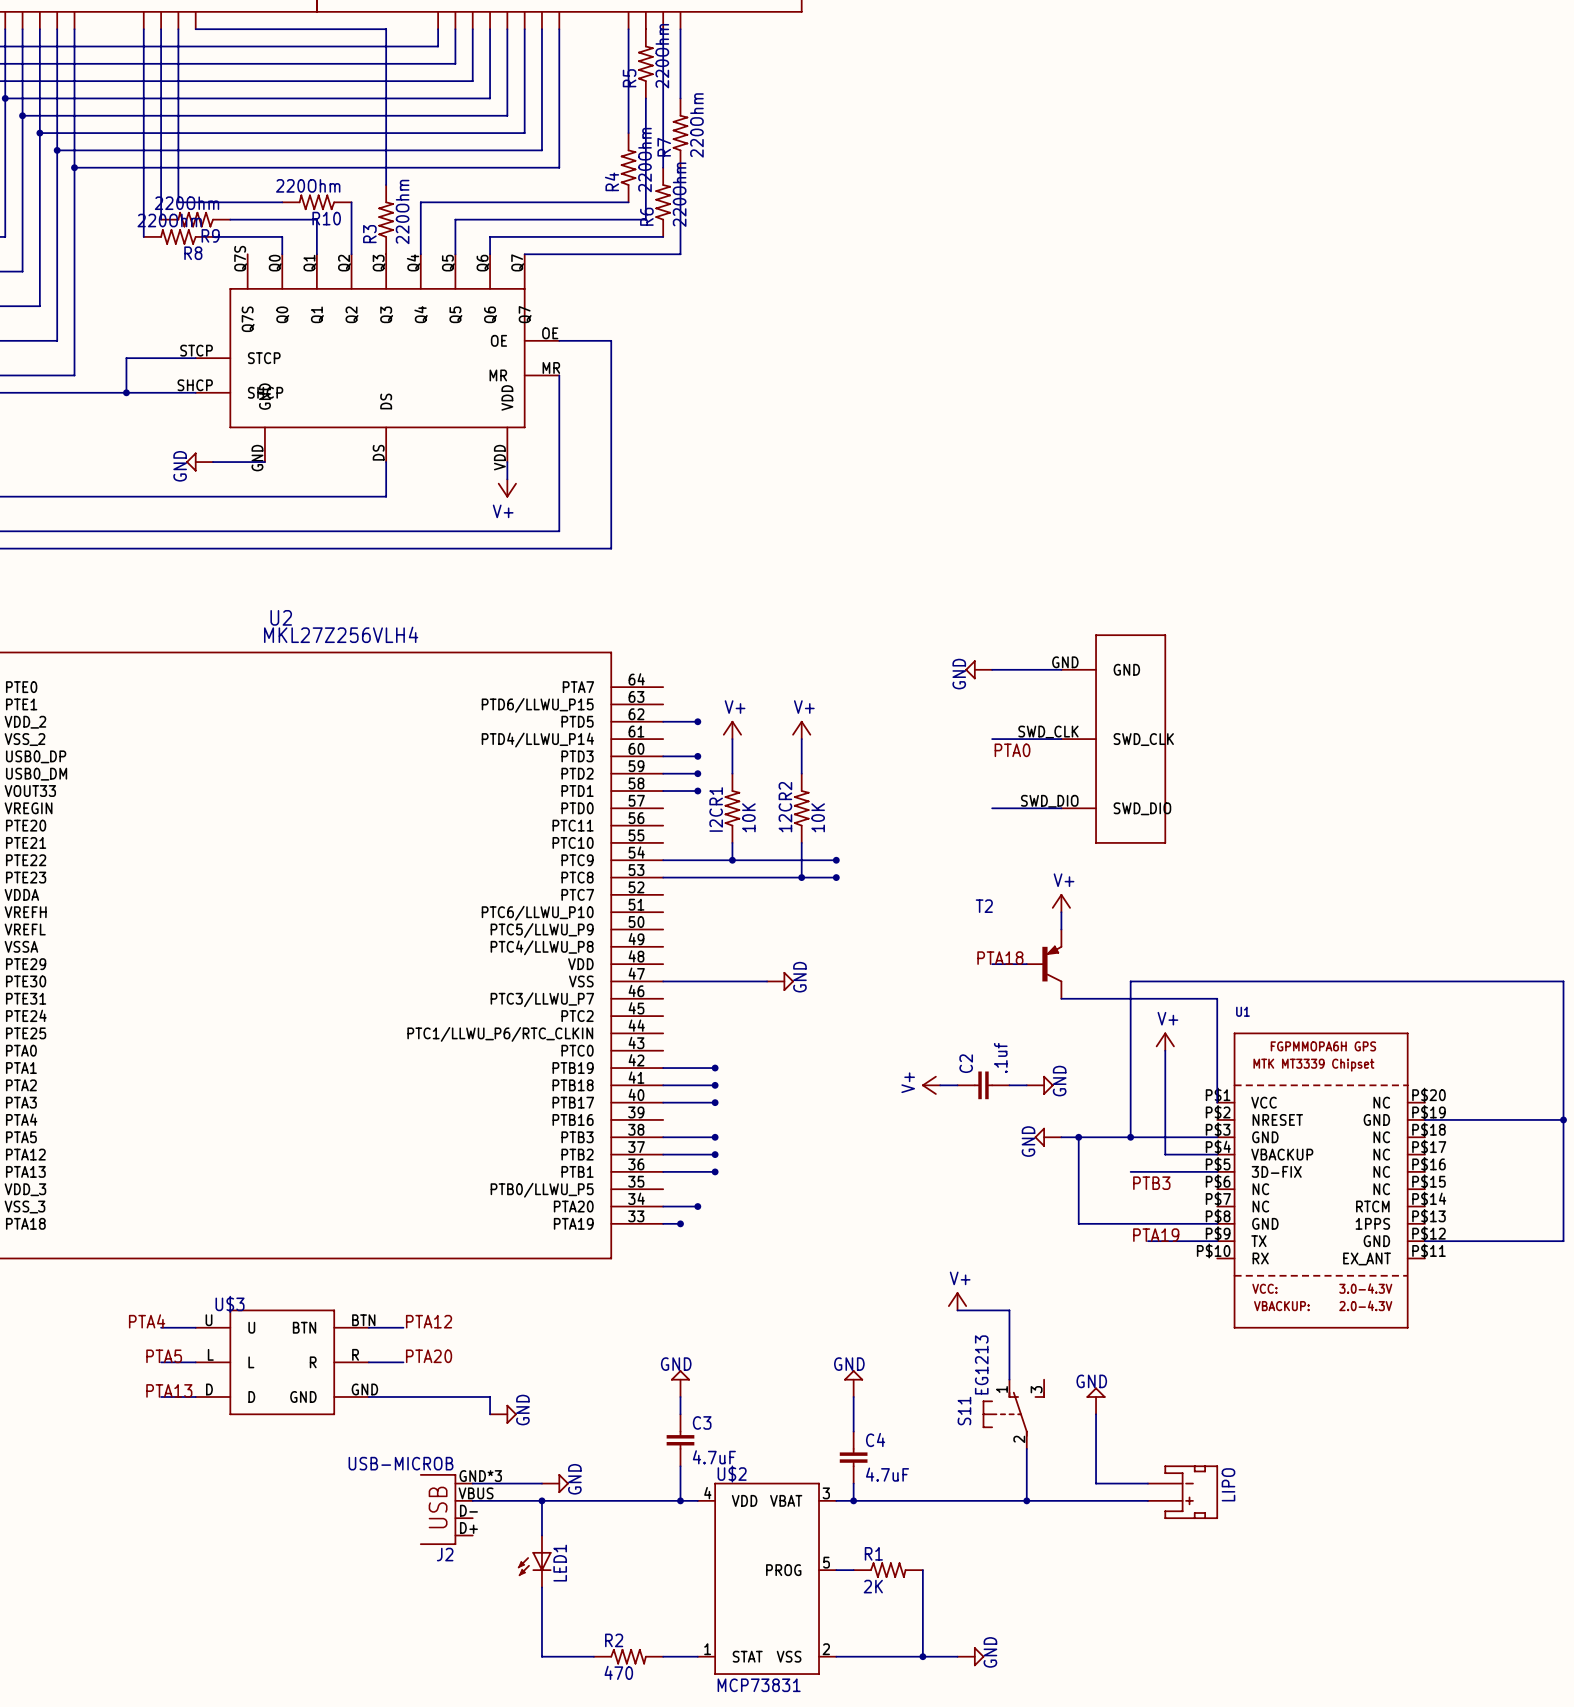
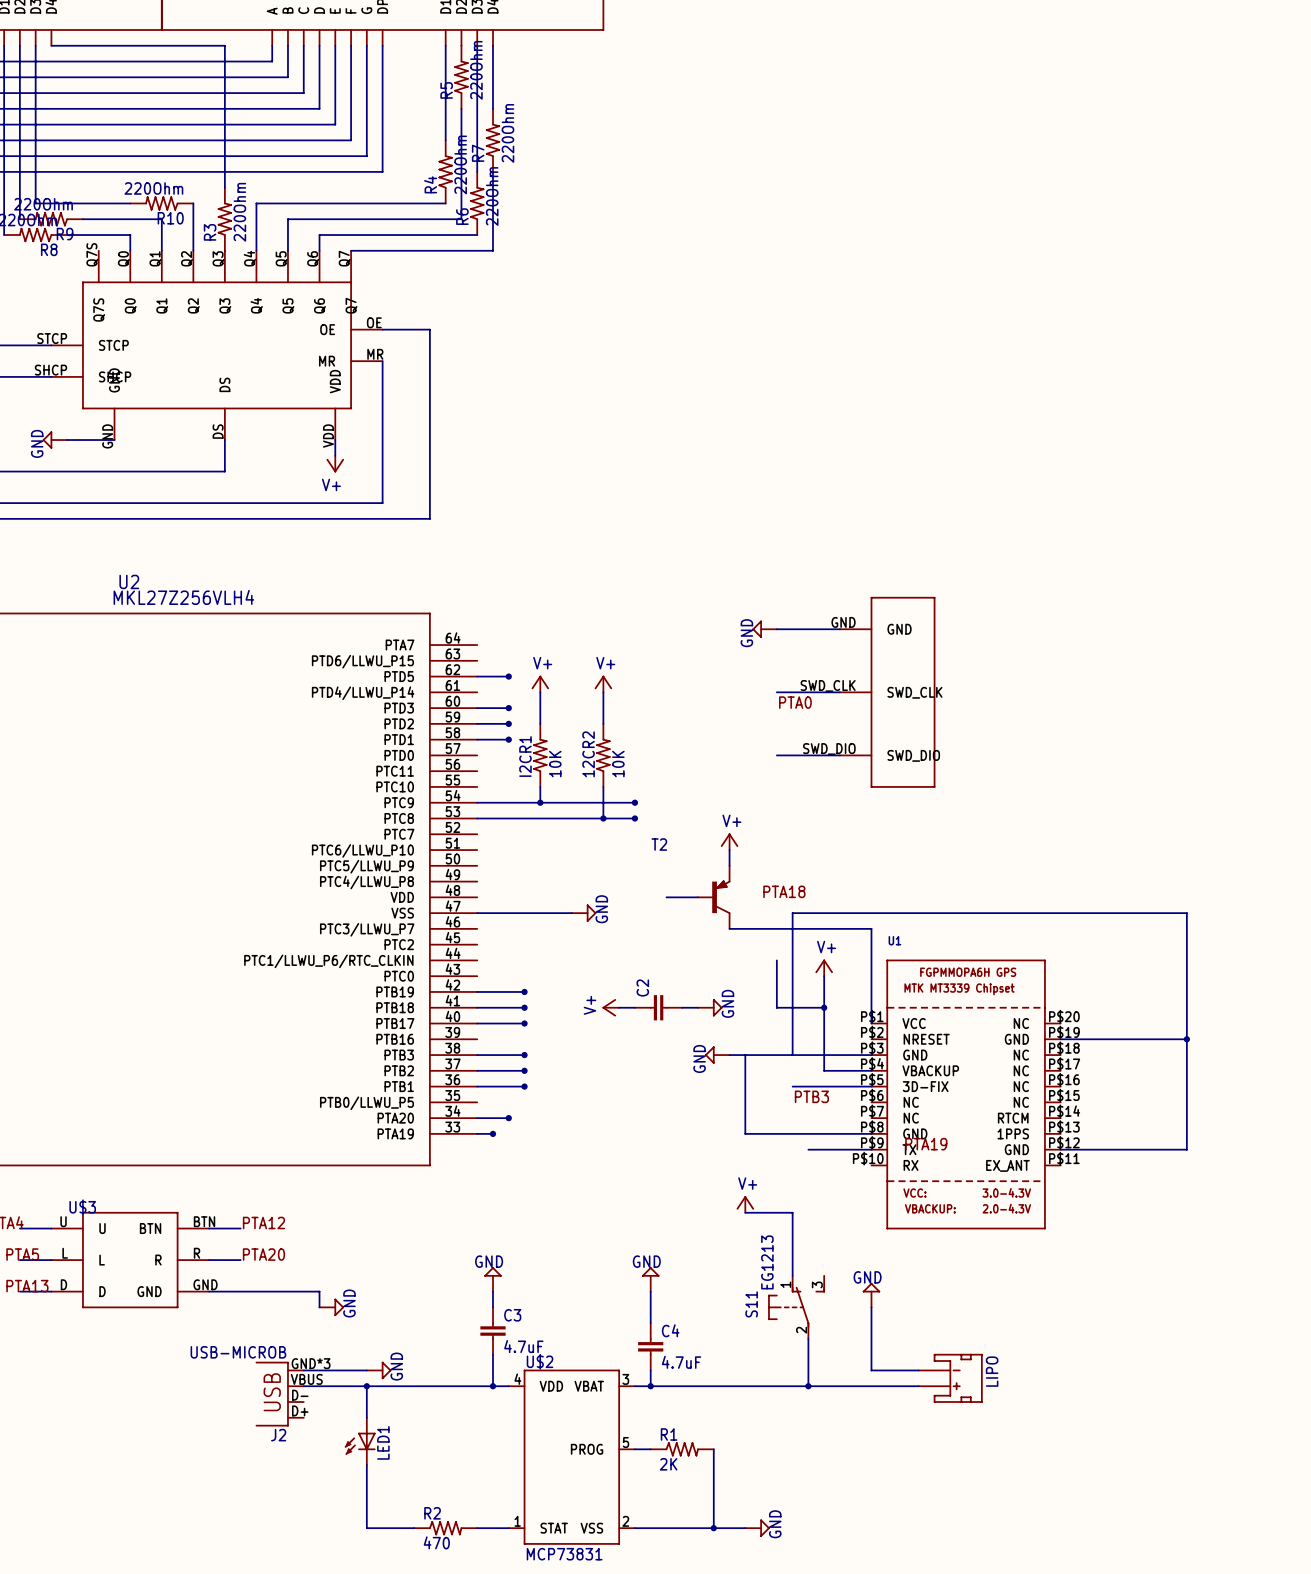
power symbol: none -> V+ (729, 841)
power symbol: V+ (1061, 903) -> none
wire: (1061, 912) (1061, 929) -> (729, 850) (729, 865)
wire: (992, 964) (1026, 964) -> (666, 897) (698, 897)
T2 position: (1044, 964) -> (714, 897)
wire: (1130, 981) (1130, 1137) -> (903, 913) (792, 913) (792, 1055)
wire: (1442, 981) (1563, 981) (1563, 1241) (1442, 1241) -> (1186, 913) (1186, 1149)
wire: none -> (729, 928) (839, 928)
wire: (1096, 998) (1217, 998) (1217, 1102) -> (871, 928) (871, 1023)
wire: none -> (776, 960) (776, 1007) (792, 1007)
power symbol: none -> V+ (824, 967)
power symbol: V+ (1165, 1041) -> none
wire: (1165, 1050) (1165, 1154) (1217, 1154) -> (824, 976) (824, 1070) (871, 1070)
C2 value: .1uf (1000, 1057) -> none
power symbol: none -> V+ (610, 1007)
wire: none -> (682, 1007) (698, 1007)
power symbol: none -> GND (710, 1007)
power symbol: V+ (931, 1085) -> none
wire: (940, 1085) (957, 1085) -> (619, 1007) (634, 1007)
C2 position: (983, 1085) -> (658, 1007)
power symbol: GND (1040, 1085) -> none
junction: none -> (824, 1007)
wire: (1442, 1119) (1563, 1119) -> (1060, 1039) (1171, 1039)
junction: none -> (1186, 1039)
junction: (1563, 1119) -> none
power symbol: none -> GND (717, 1055)
power symbol: GND (1047, 1137) -> none
wire: (1078, 1137) (1078, 1223) -> (745, 1055) (745, 1133) (855, 1133)
junction: (1078, 1137) -> none
wire: (1096, 1137) (1217, 1137) -> (729, 1055) (839, 1055)
junction: (1130, 1137) -> none
wire: (1130, 1171) (1217, 1171) -> (792, 1086) (871, 1086)
U1 position: (1321, 1180) -> (966, 1094)
label position: PTB3 (1151, 1183) -> PTB3 (811, 1096)
wire: (1096, 1223) (1217, 1223) -> none
wire: (1147, 1241) (1217, 1241) -> (808, 1149) (871, 1149)
wire: none -> (1060, 1149) (1171, 1149)

